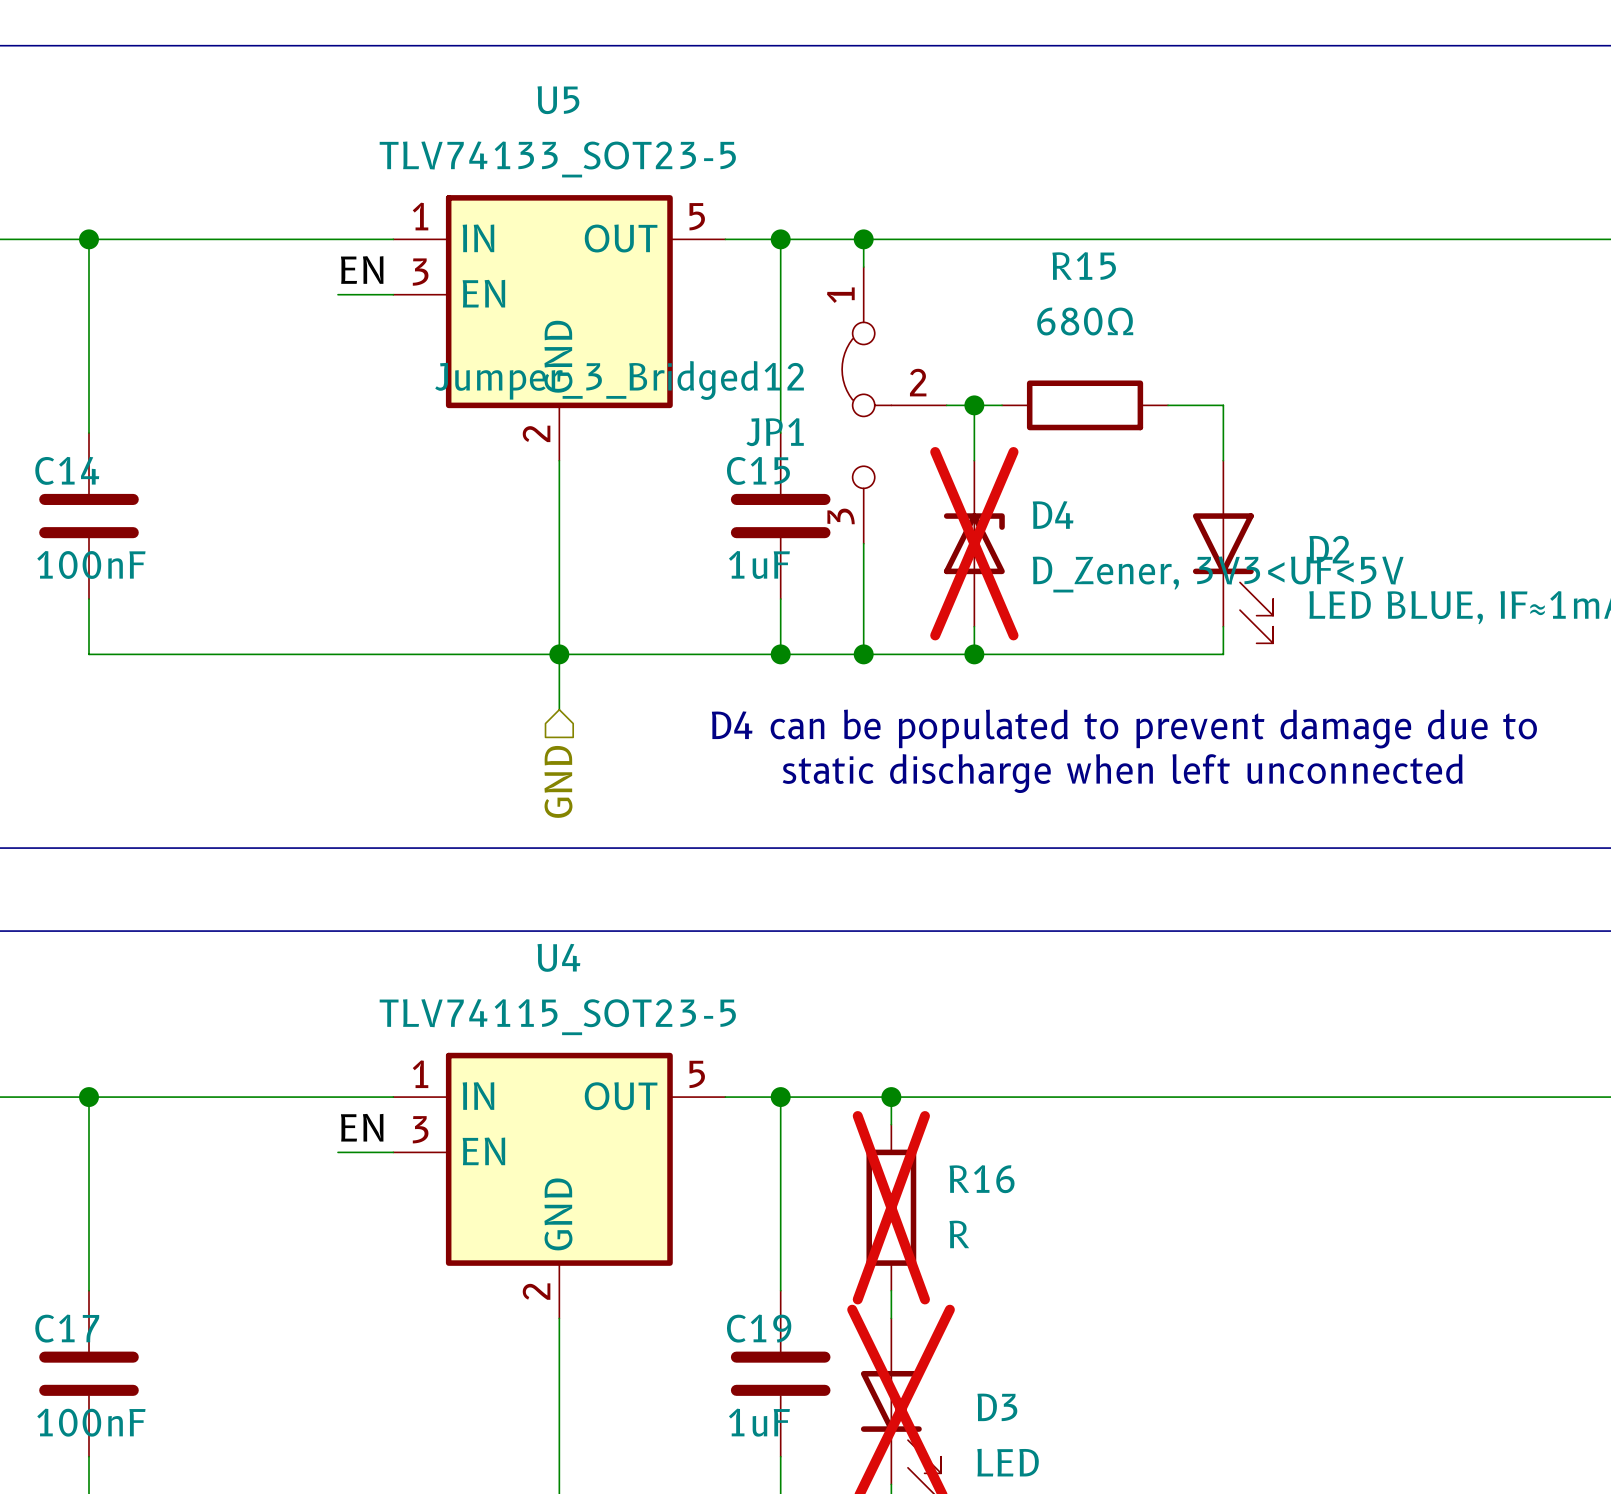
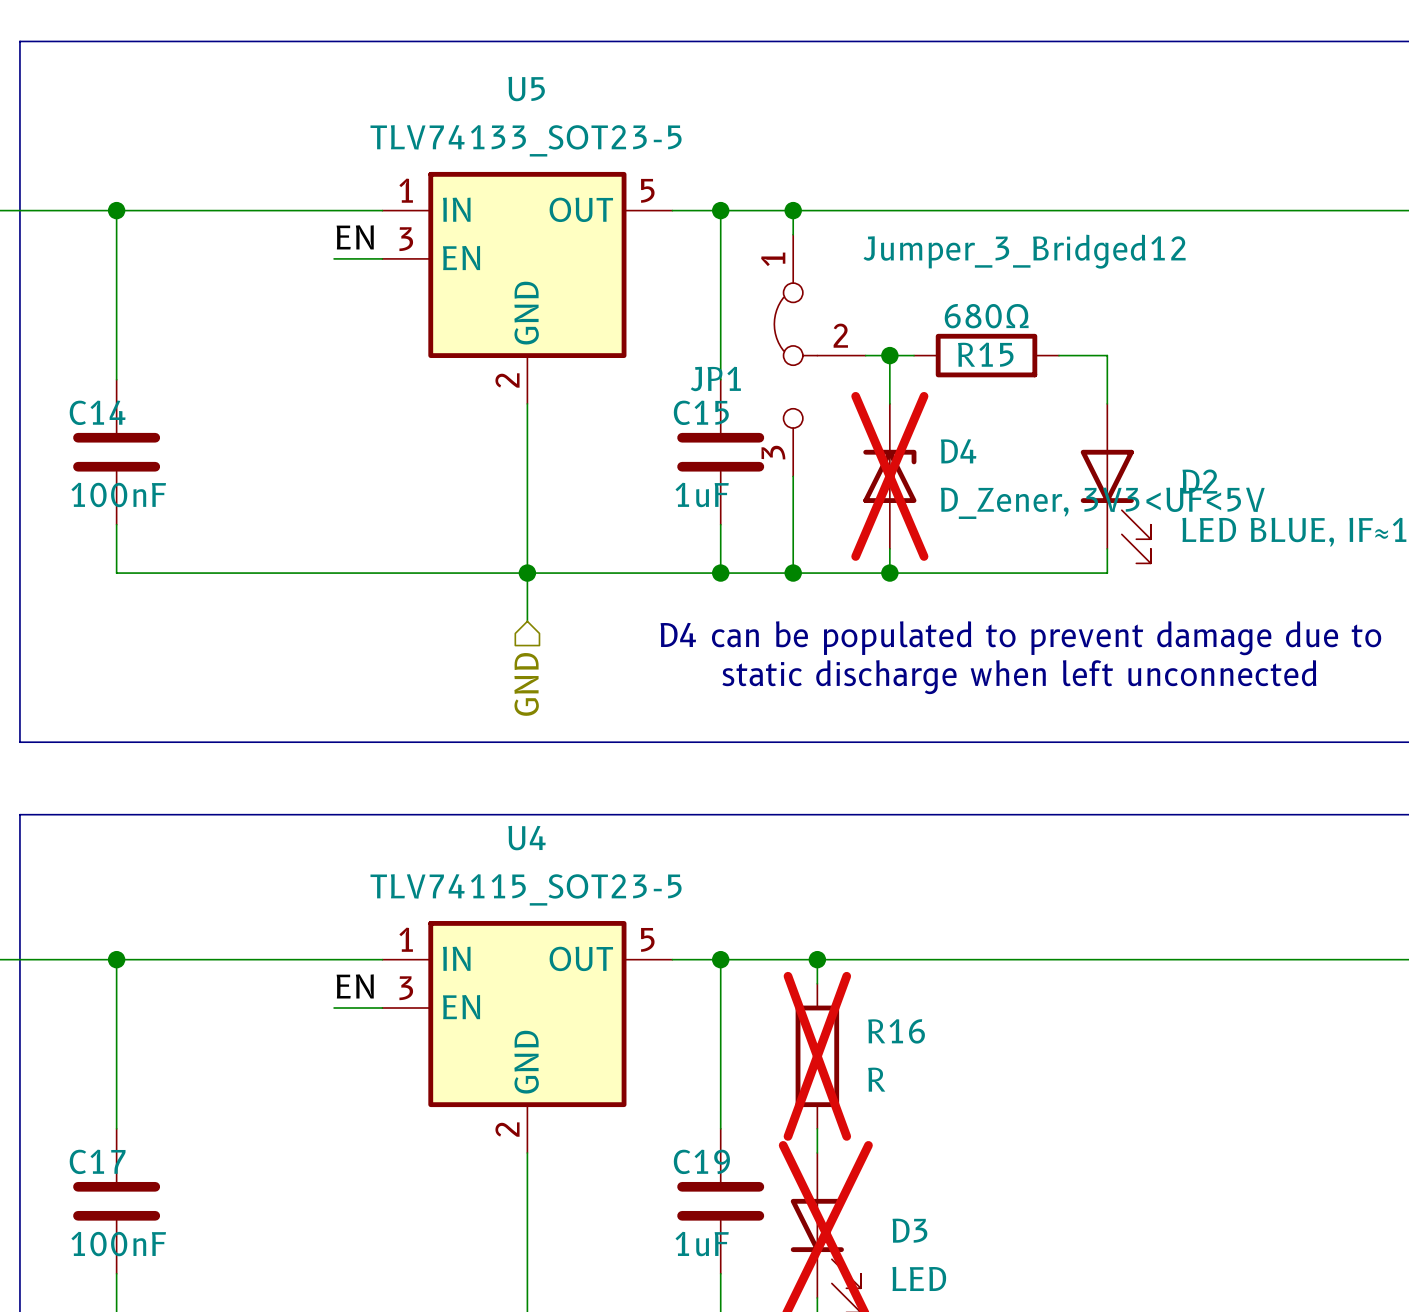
R15 name position: R15 (1084, 266) -> R15 (985, 354)
R15 value position: 680Ω (1085, 321) -> 680Ω (986, 316)
JP1 value position: Jumper_3_Bridged12 (619, 380) -> Jumper_3_Bridged12 (1024, 251)

